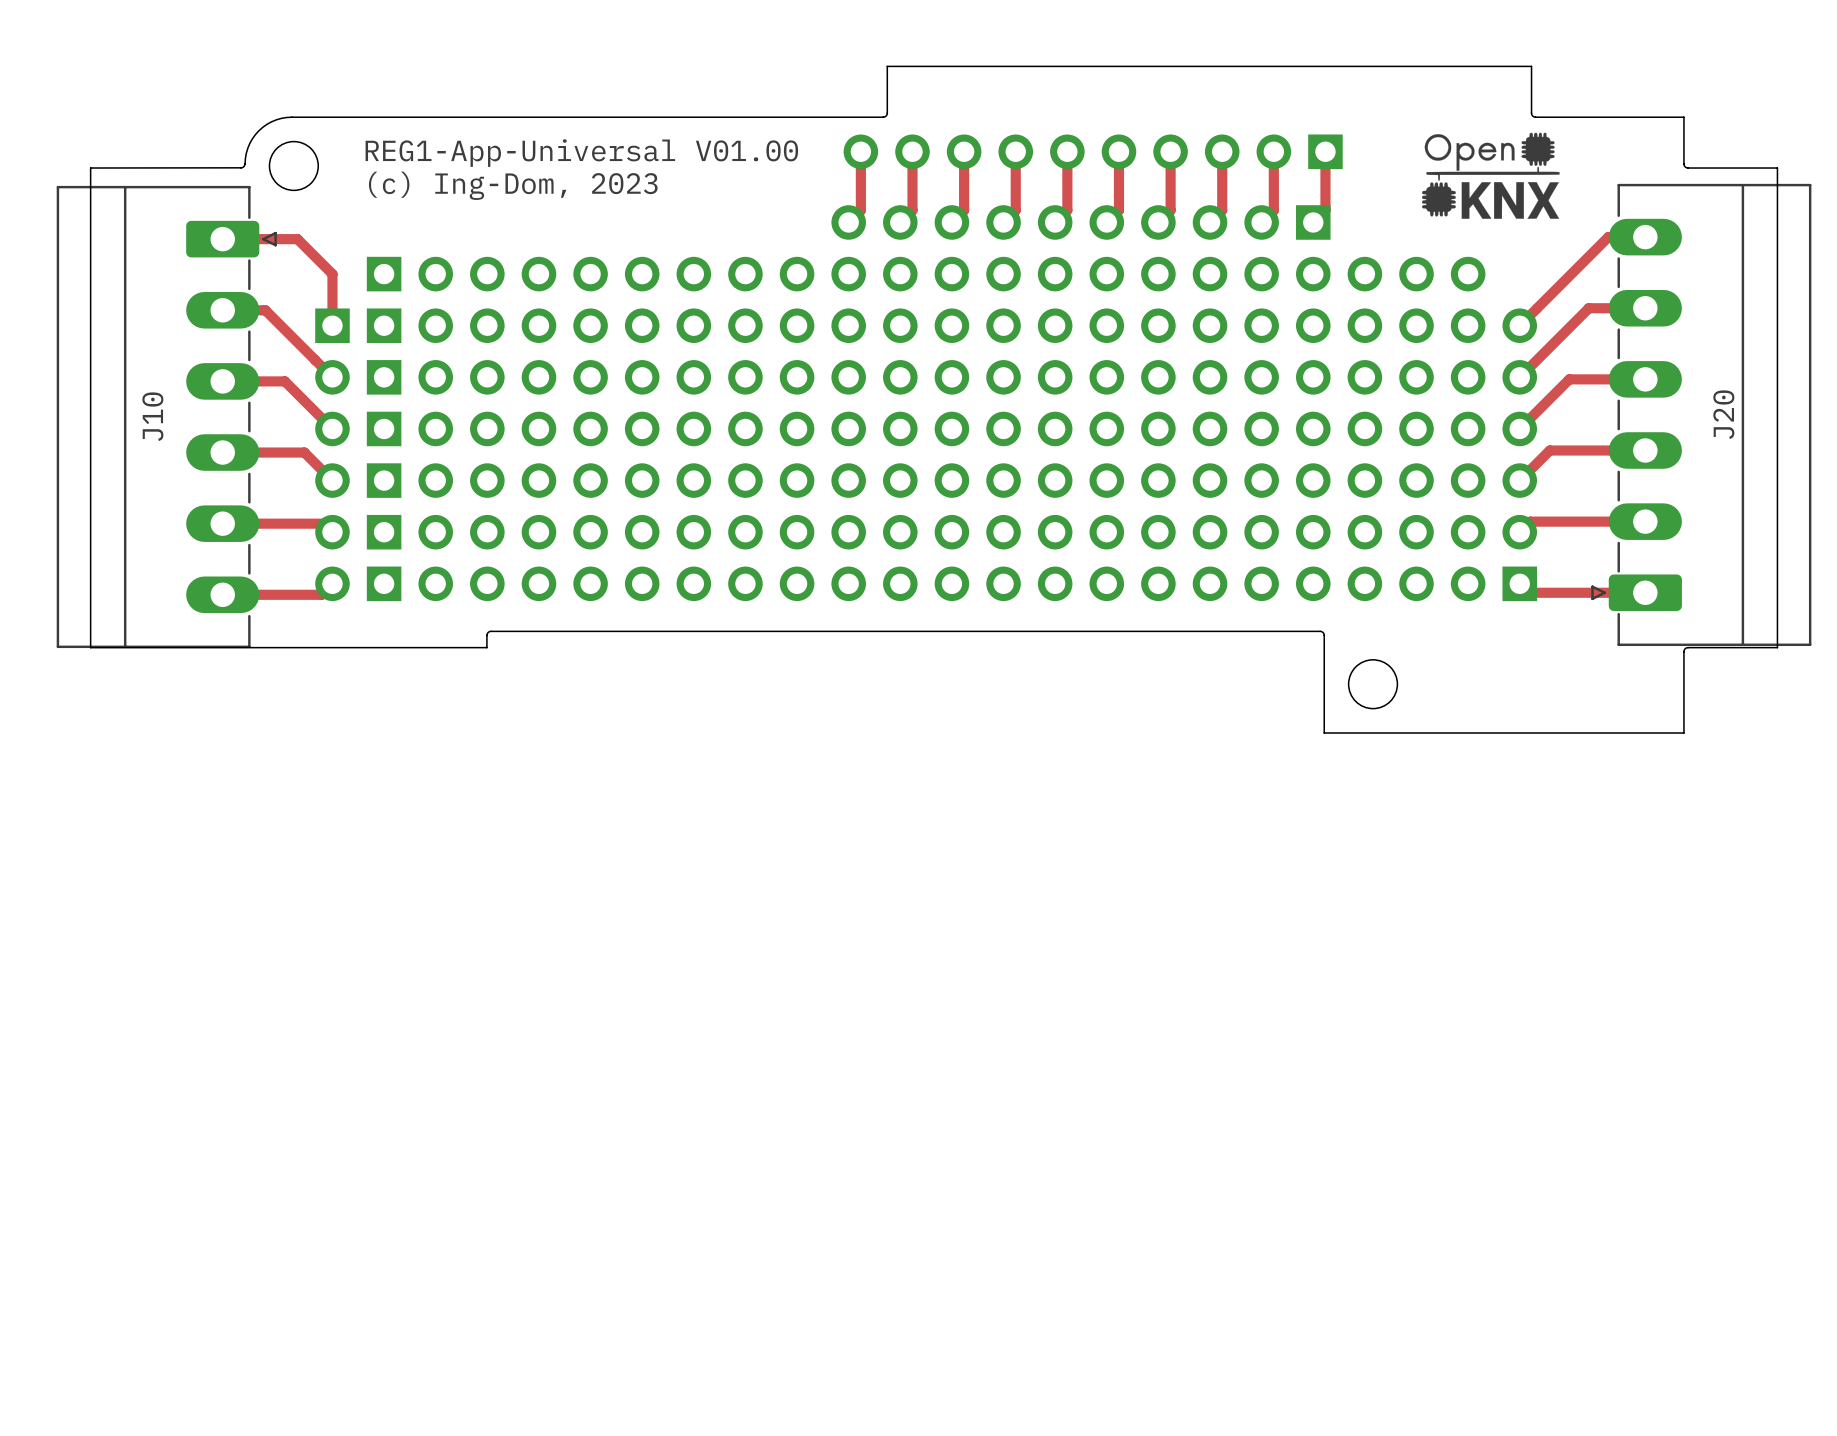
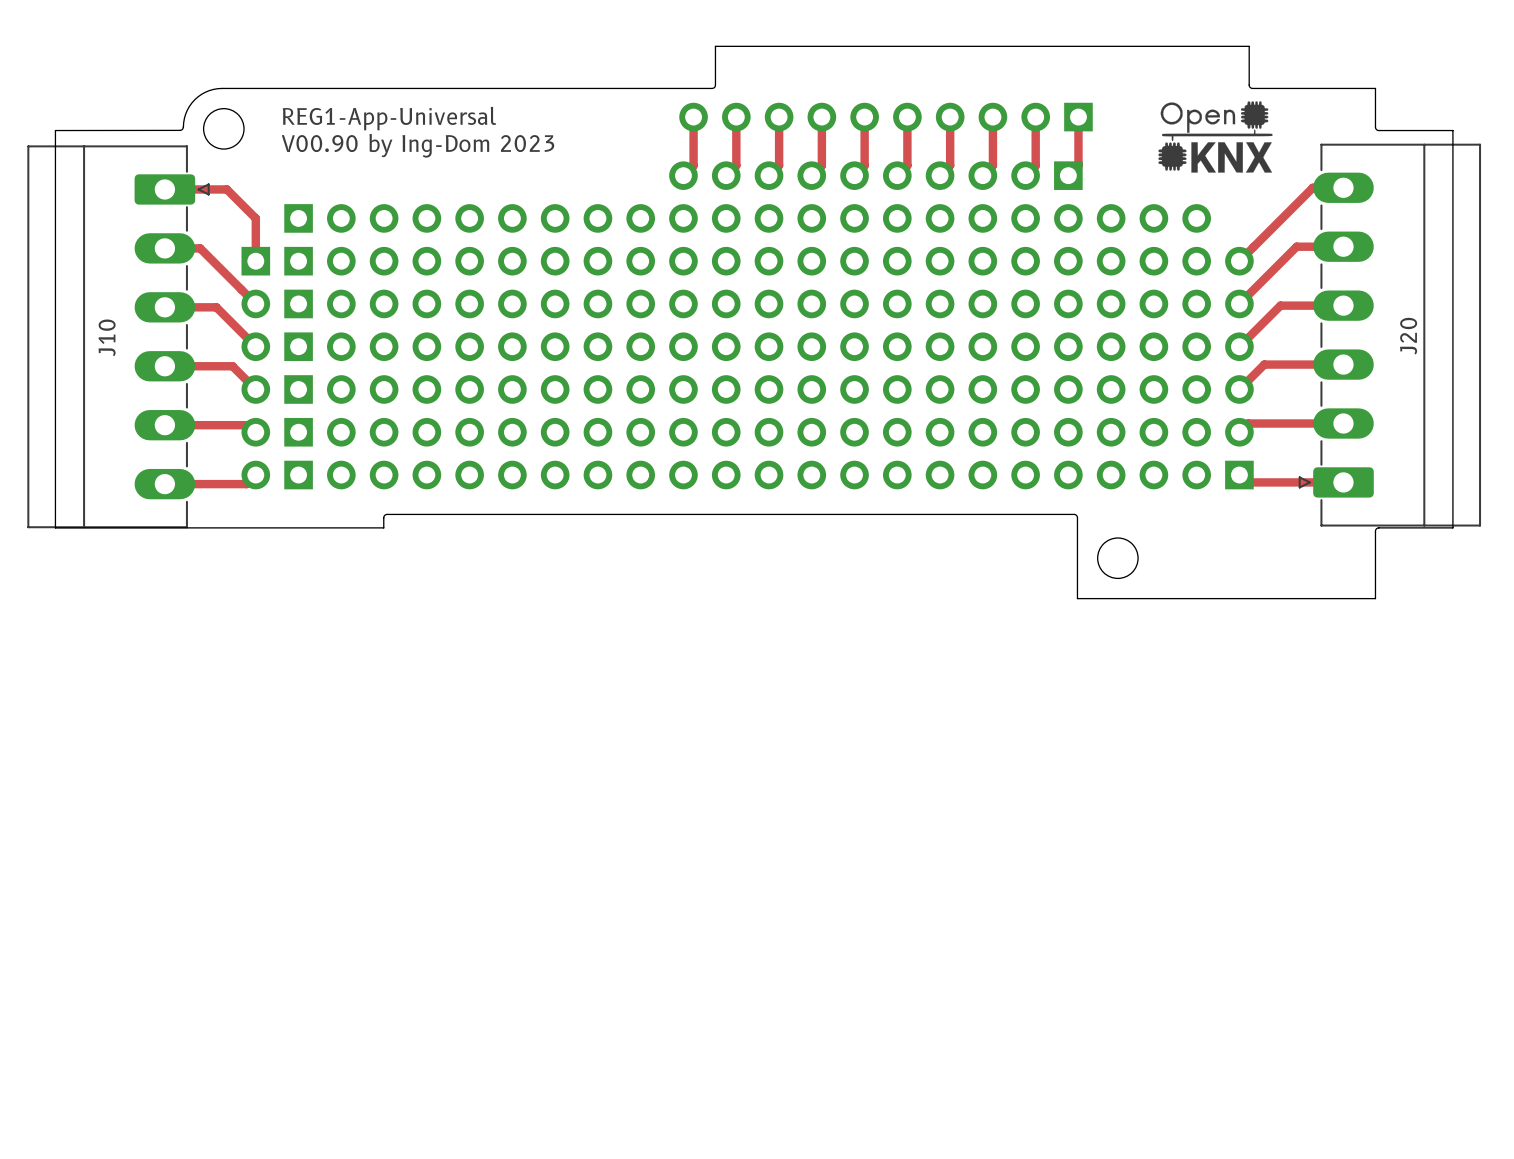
text: REG1-App-Universal V01.00 (581, 153) -> REG1-App-Universal (389, 118)
text: (c) Ing-Dom, 2023 (513, 185) -> V00.90 by Ing-Dom 2023 (418, 145)

